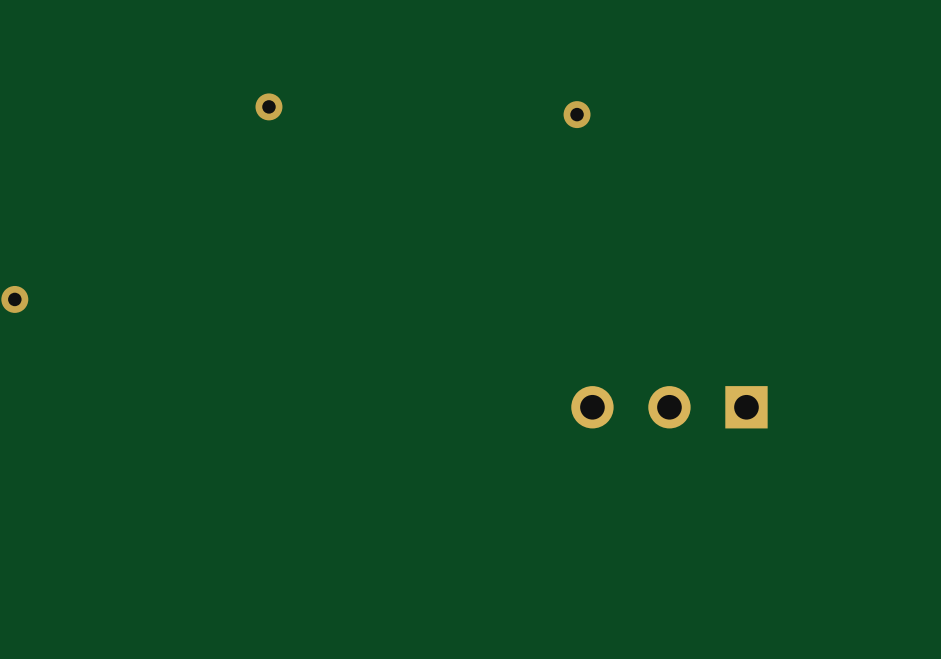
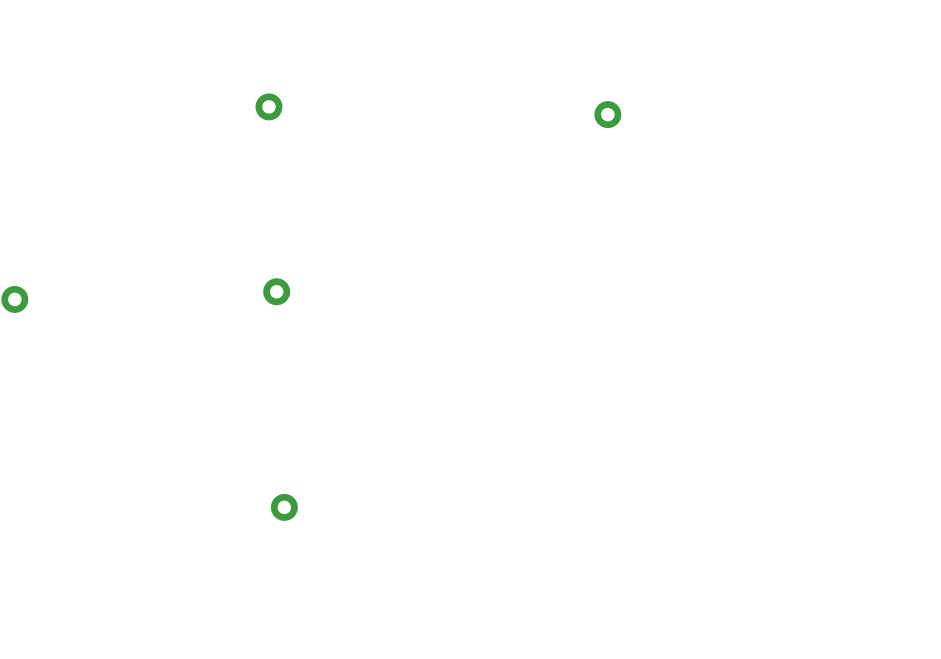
via position: (577, 114) -> (607, 114)
via: none -> (276, 291)
part: (669, 407) -> none
via: none -> (284, 507)

